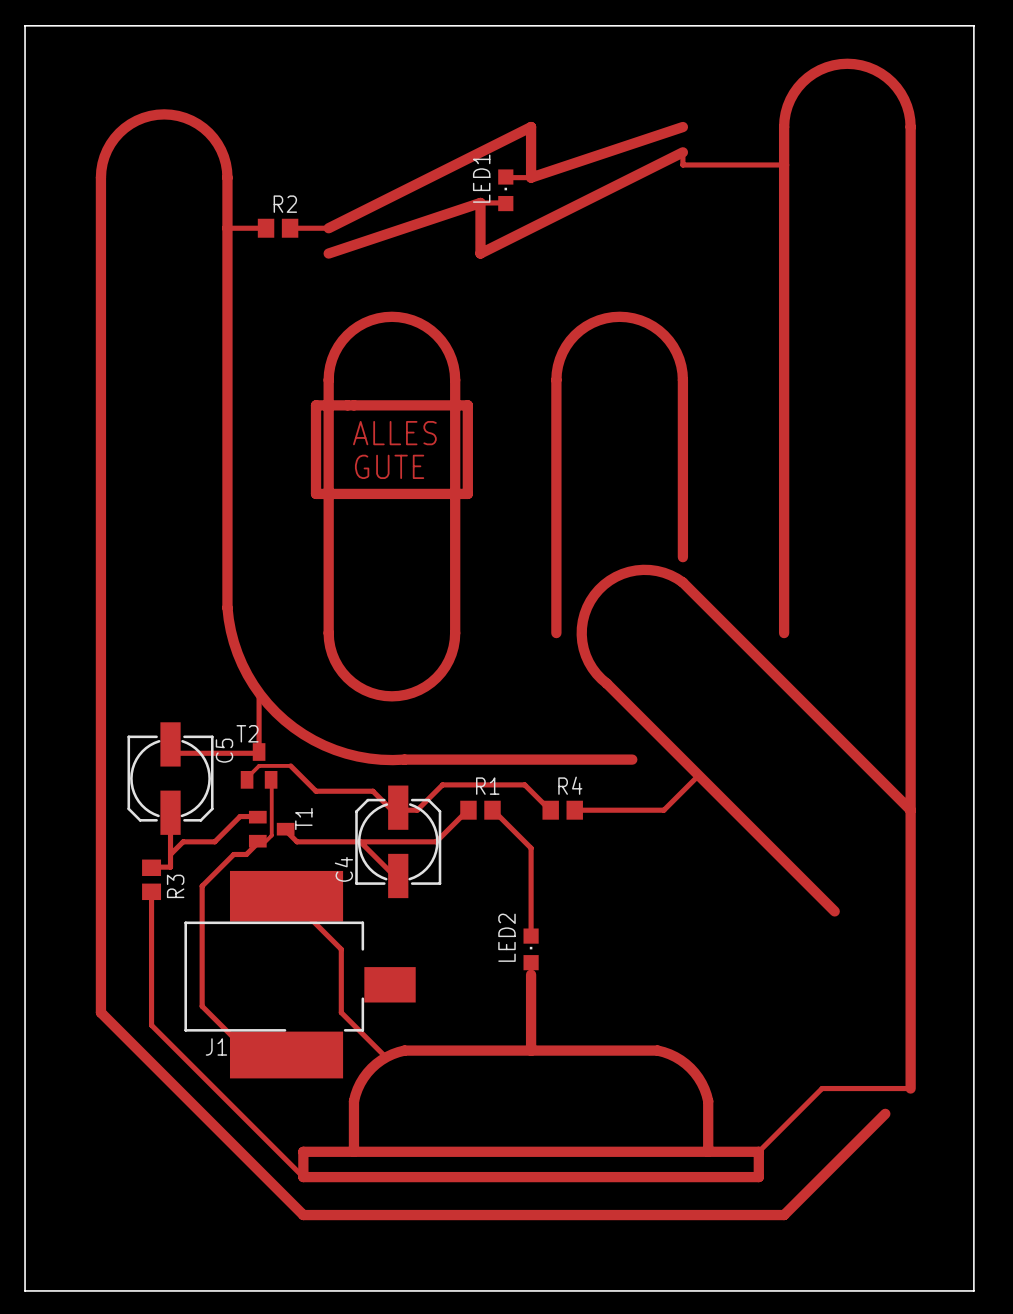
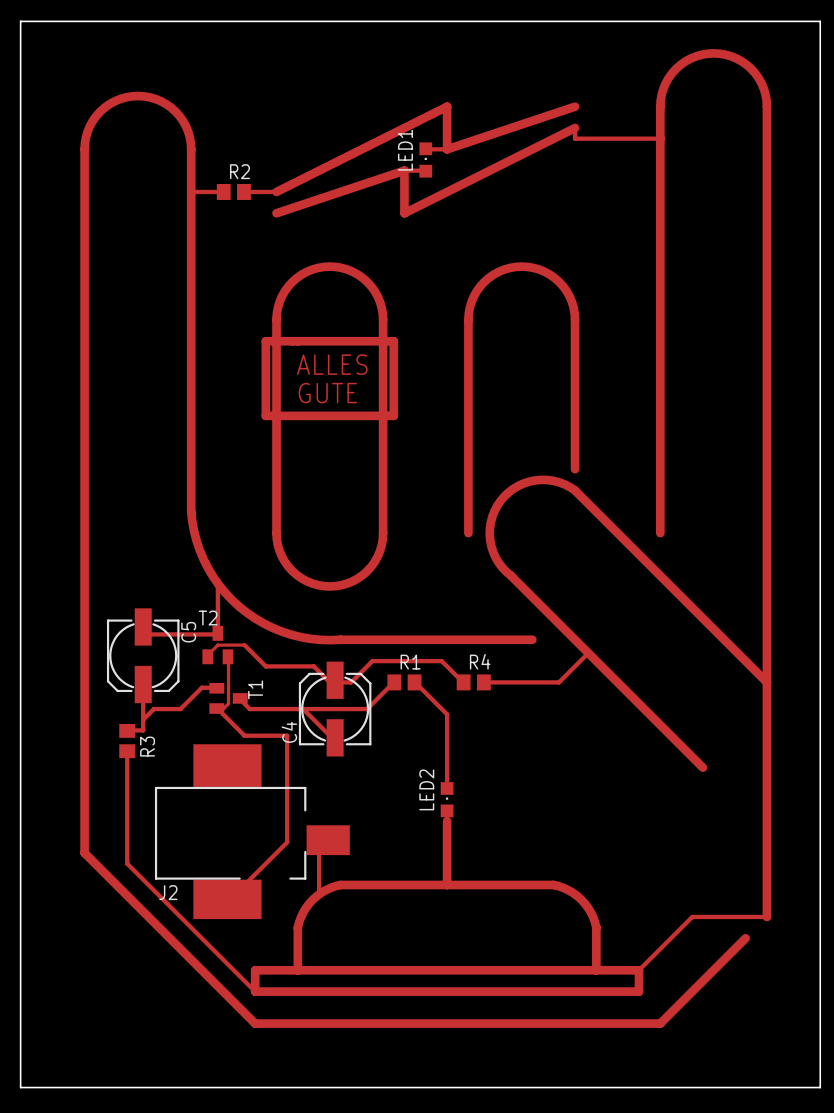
track: (259, 841) (246, 854) (233, 854) (202, 886) (202, 1006) (233, 1037) -> none
track: (297, 905) (341, 949) -> (217, 709) (244, 735) (287, 735) (287, 799)
J1: (300, 974) -> none
J2: none -> (252, 831)
track: (341, 999) (341, 1012) (385, 1056) -> (287, 842) (244, 884)
track: none -> (319, 853) (319, 895)

